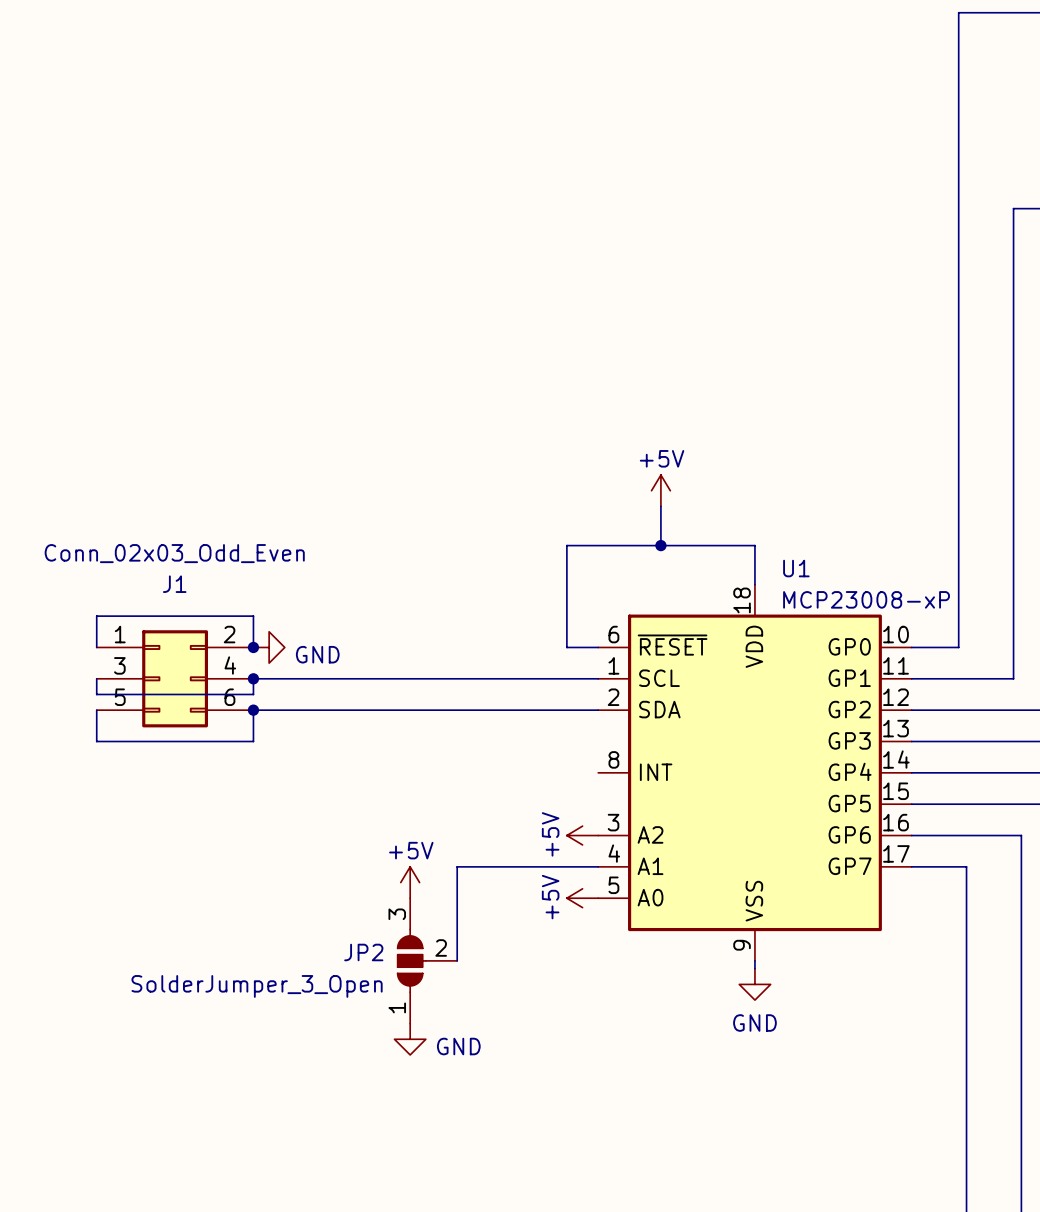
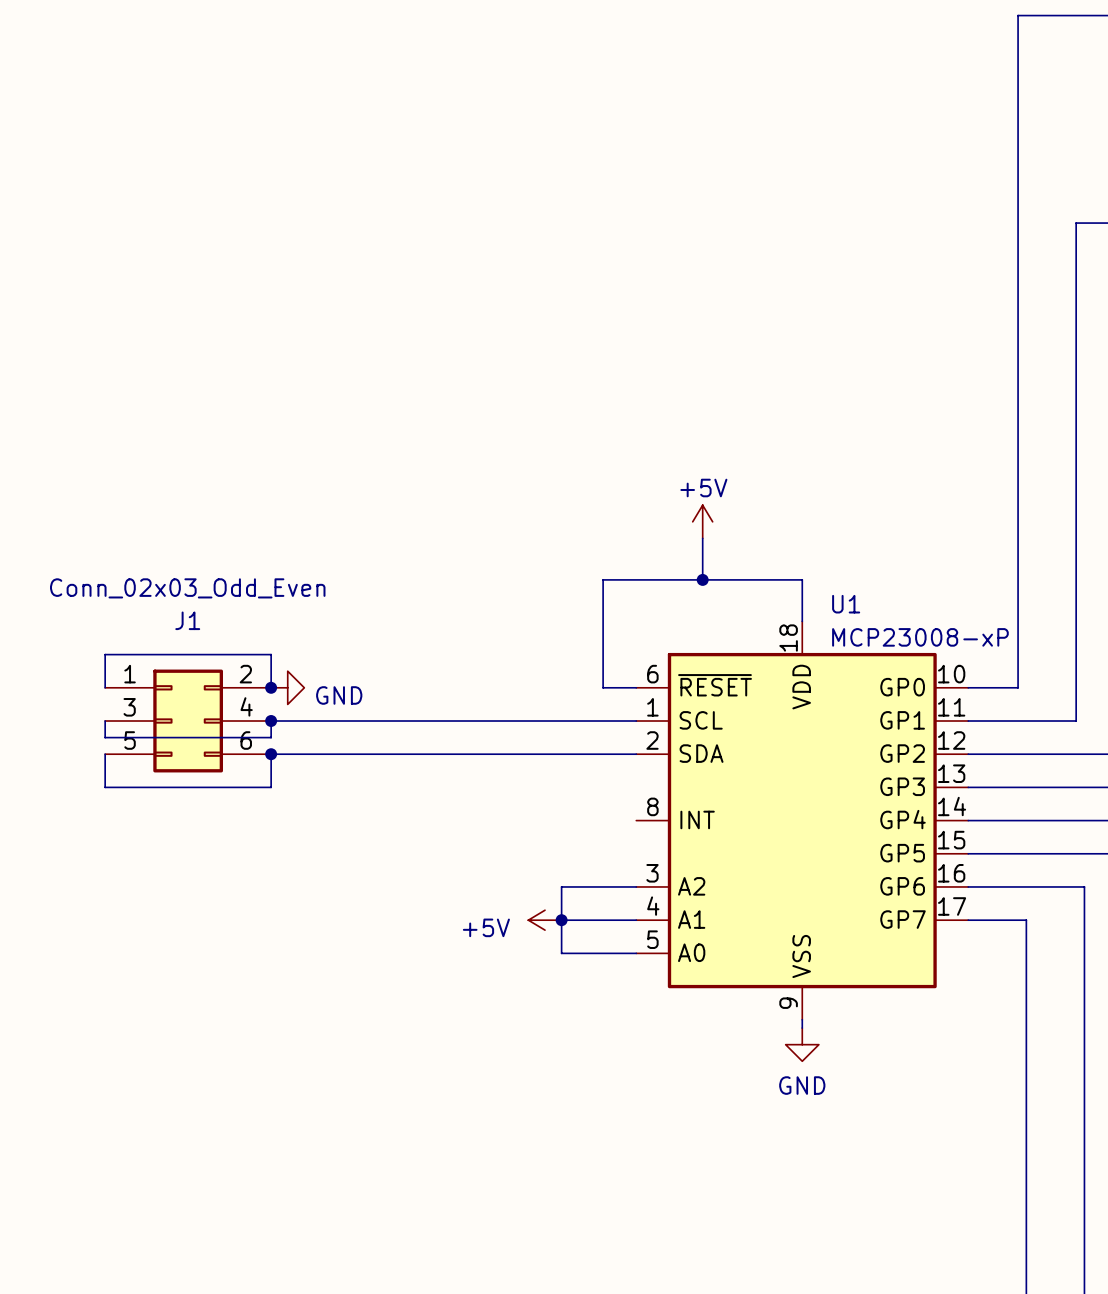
power symbol: +5V (582, 835) -> none
wire: none -> (636, 886) (561, 886) (561, 953) (636, 953)
power symbol: none -> +5V (545, 920)
wire: (527, 866) (457, 866) (457, 960) -> none
junction: none -> (561, 920)
power symbol: +5V (410, 882) -> none
power symbol: +5V (582, 898) -> none
JP2: SolderJumper_3_Open (427, 960) -> none
power symbol: GND (410, 1039) -> none

